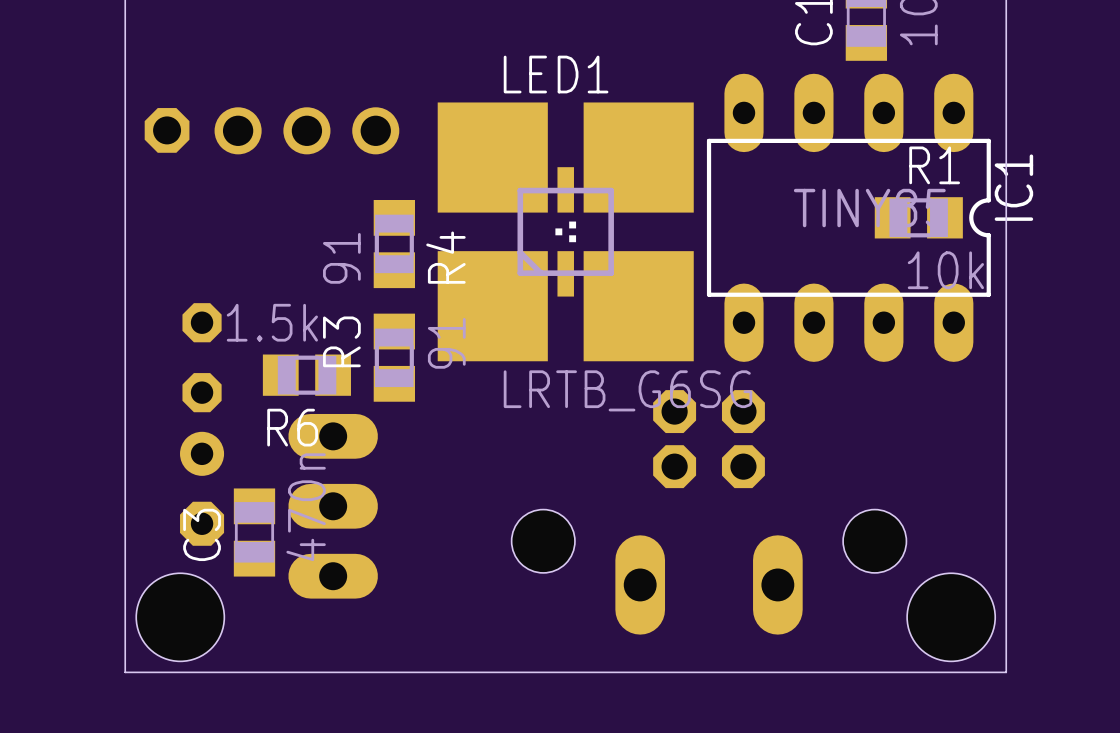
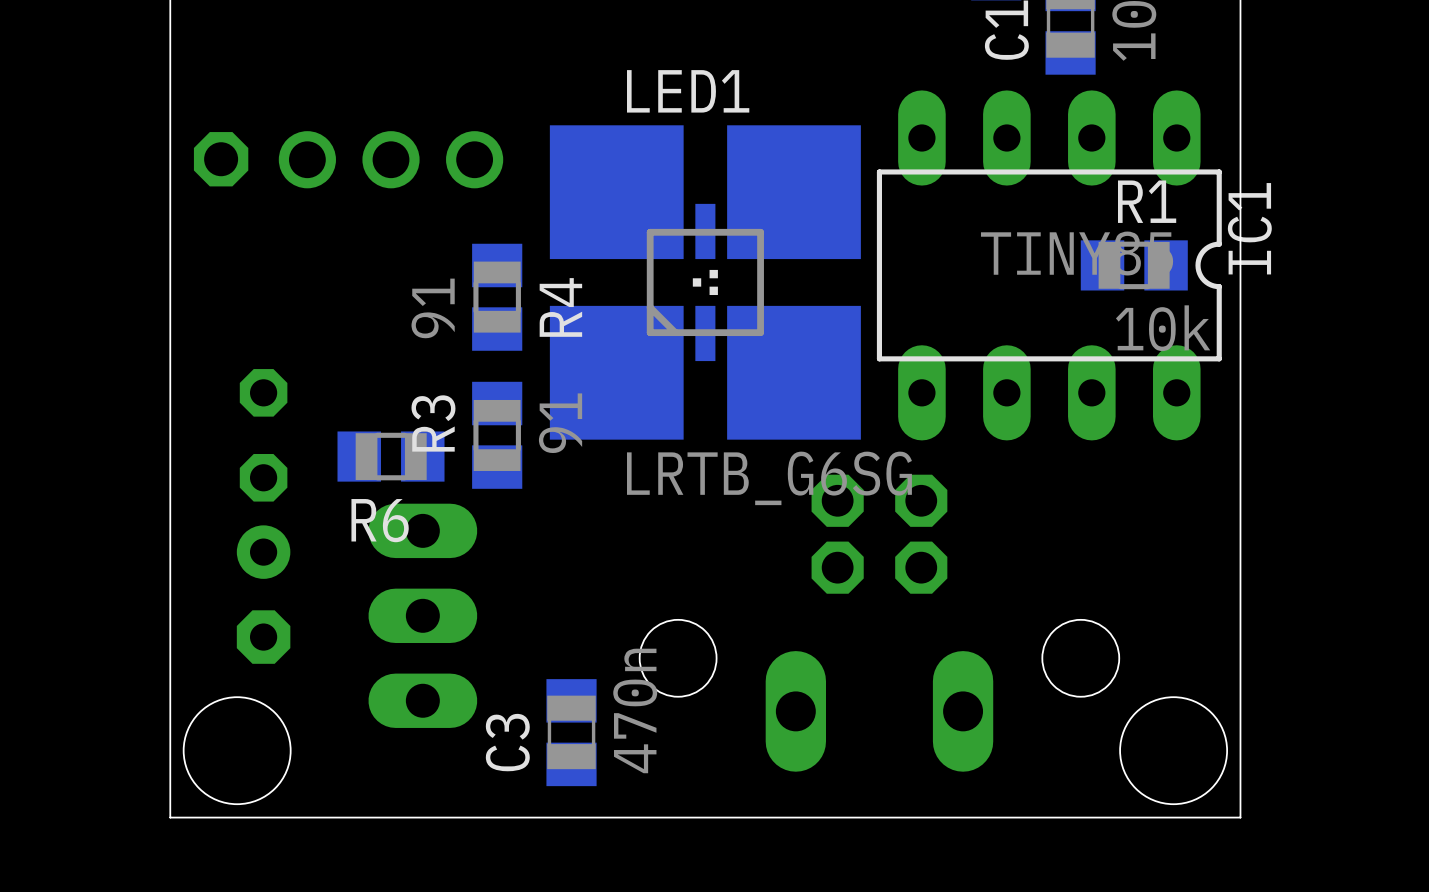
R6 value: 1.5k (272, 322) -> none
C3 position: (254, 532) -> (571, 732)

